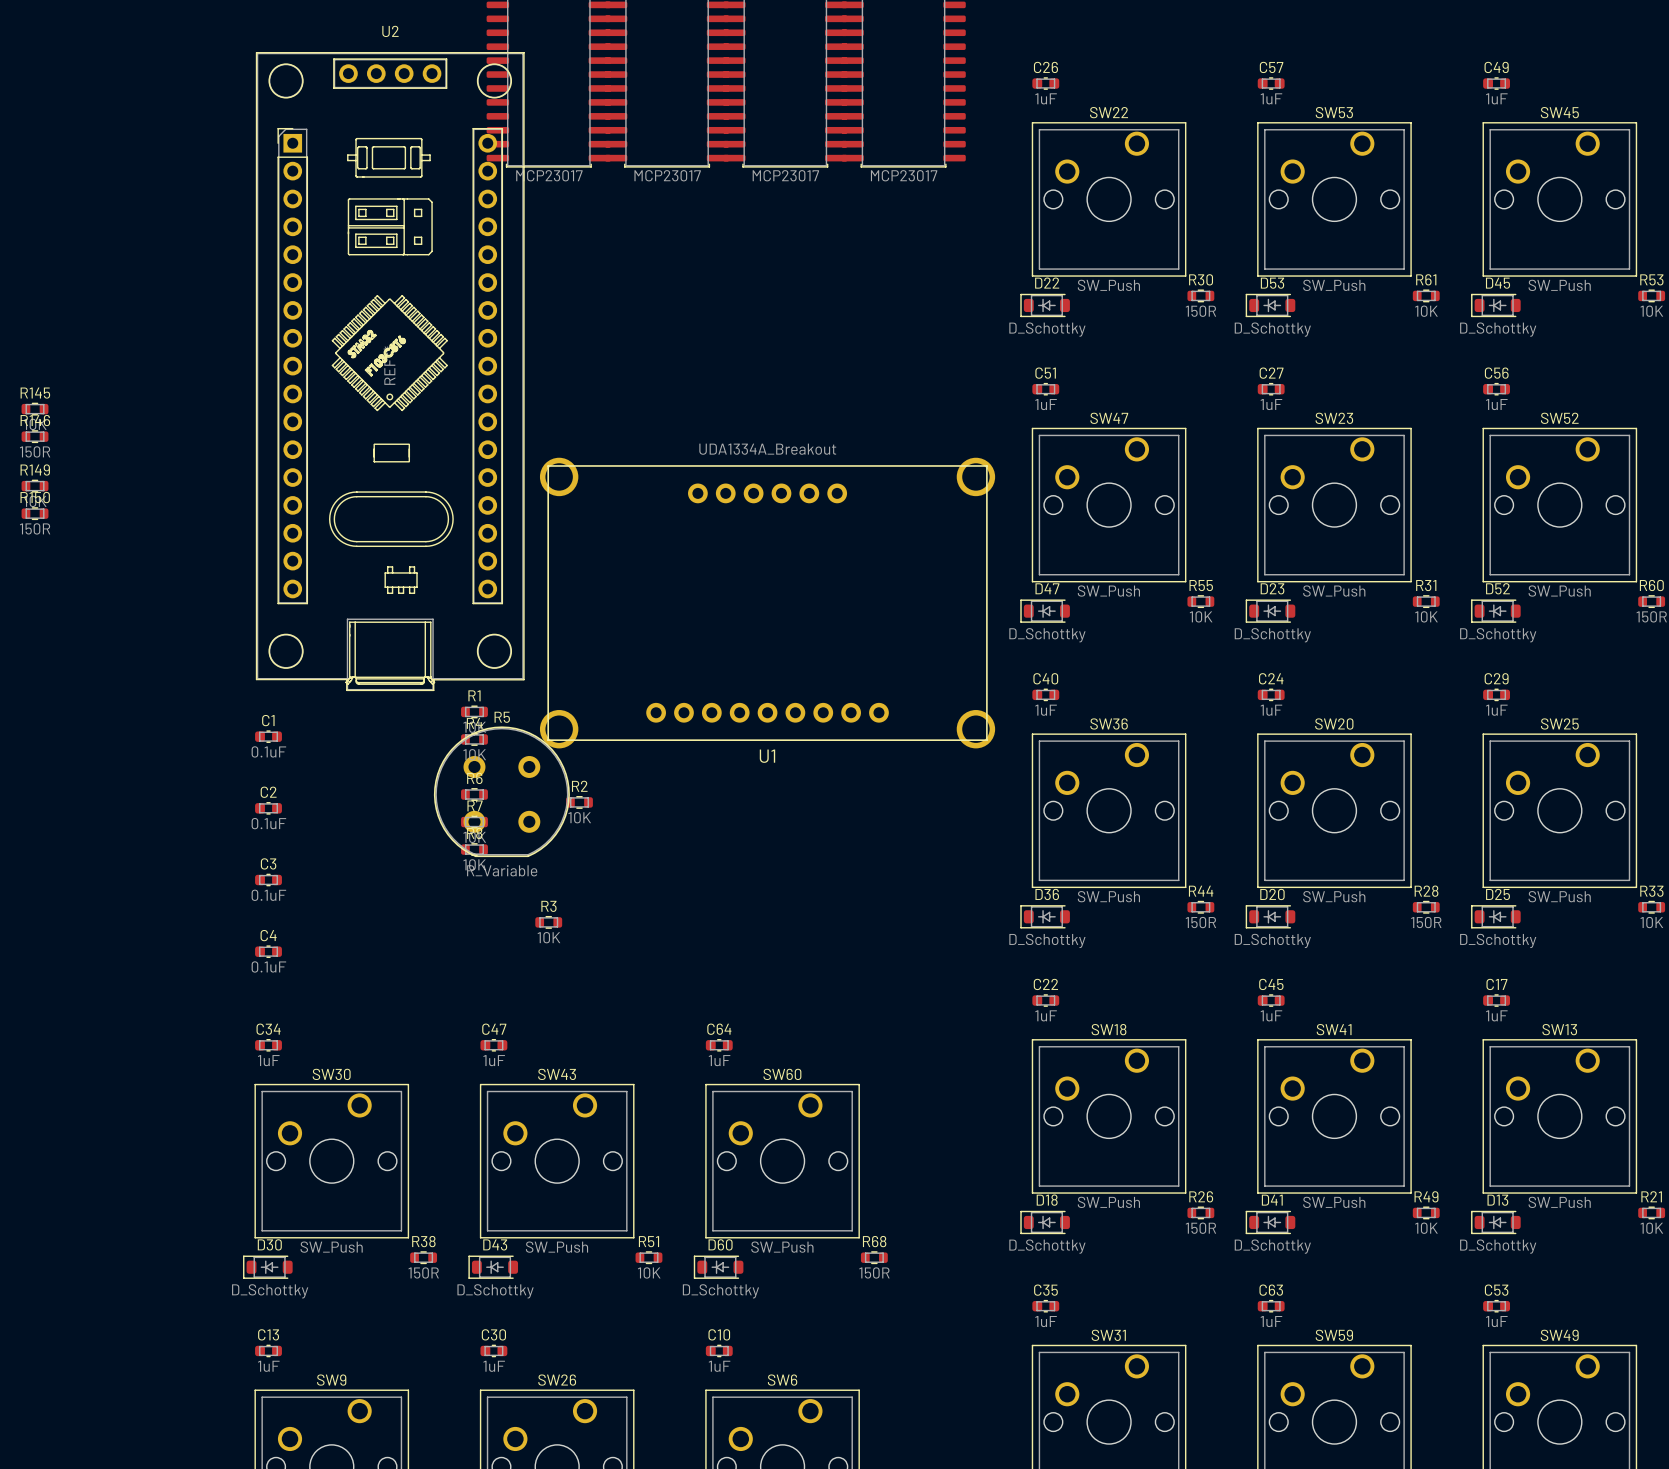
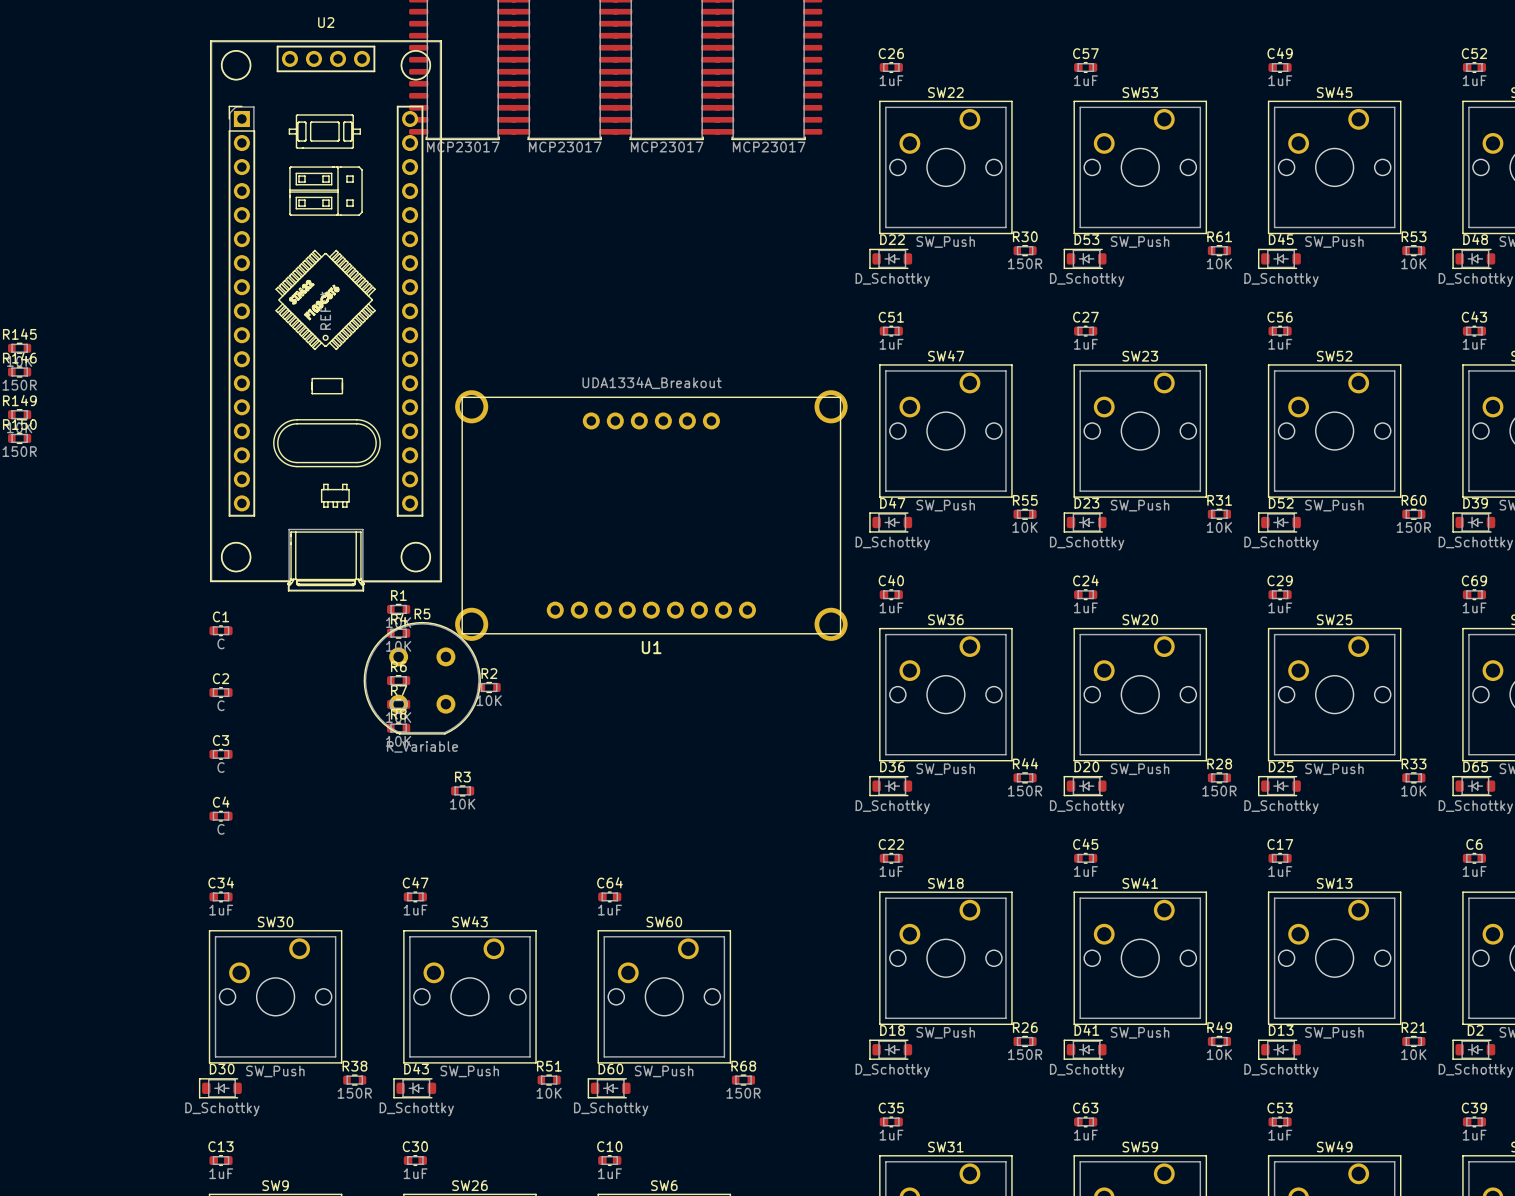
C1 value: 0.1uF (268, 751) -> C (221, 643)
C2 value: 0.1uF (268, 823) -> C (221, 705)
C3 value: 0.1uF (268, 895) -> C (221, 767)
C4 value: 0.1uF (268, 966) -> C (221, 829)

